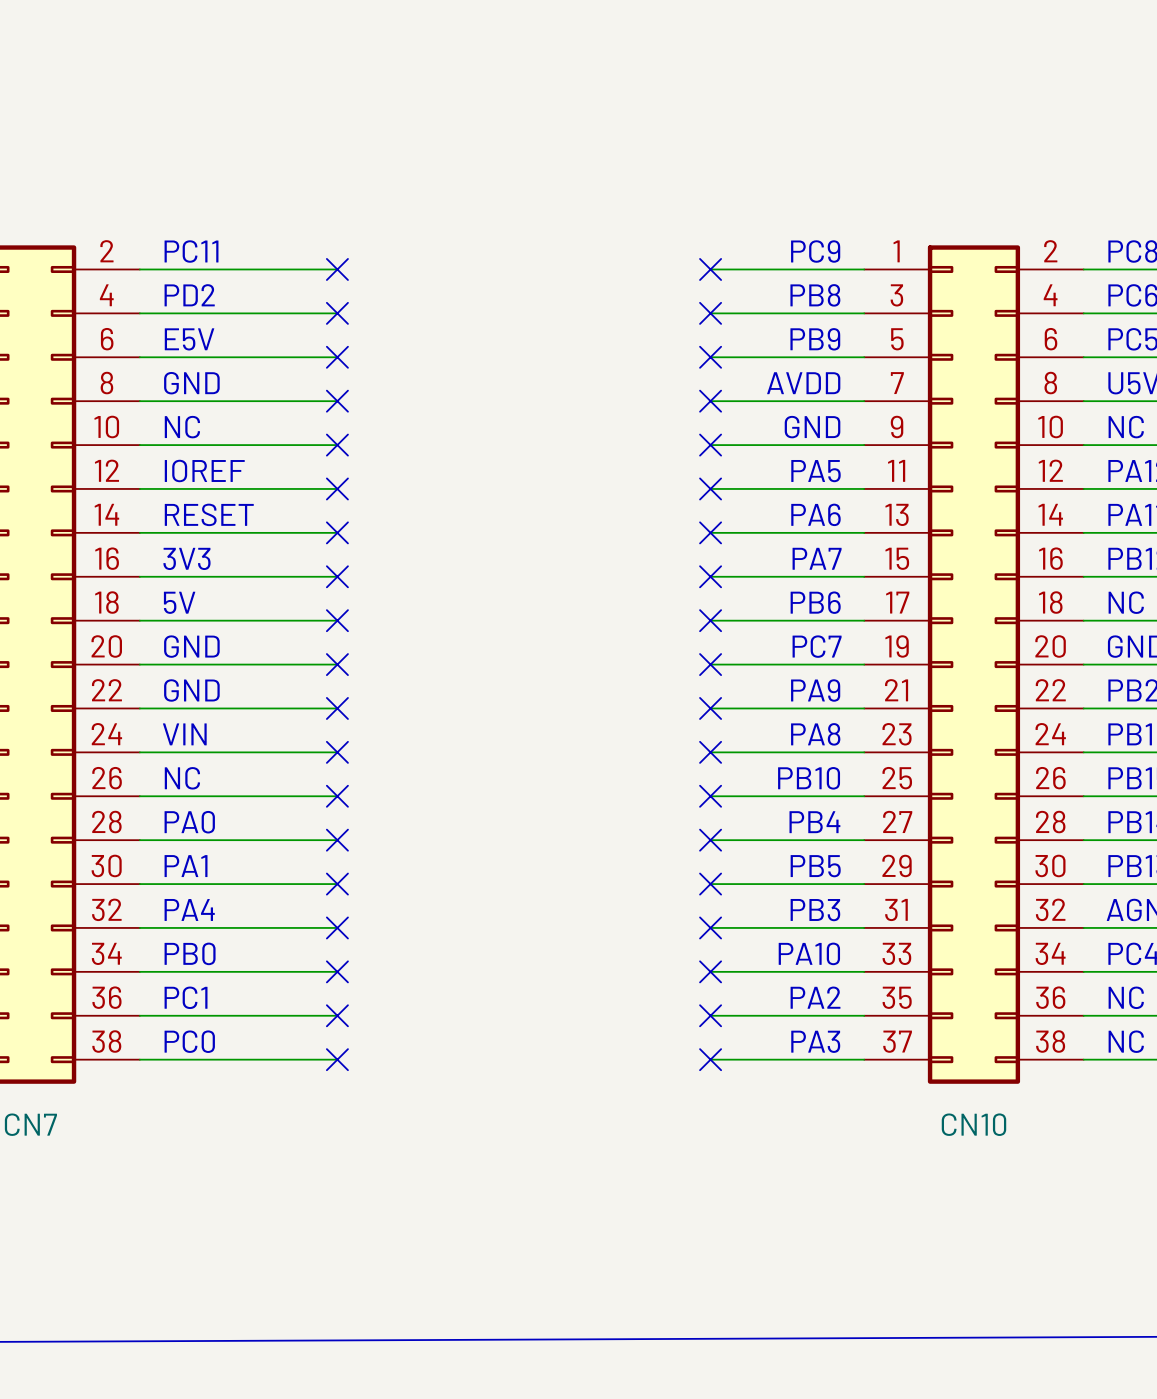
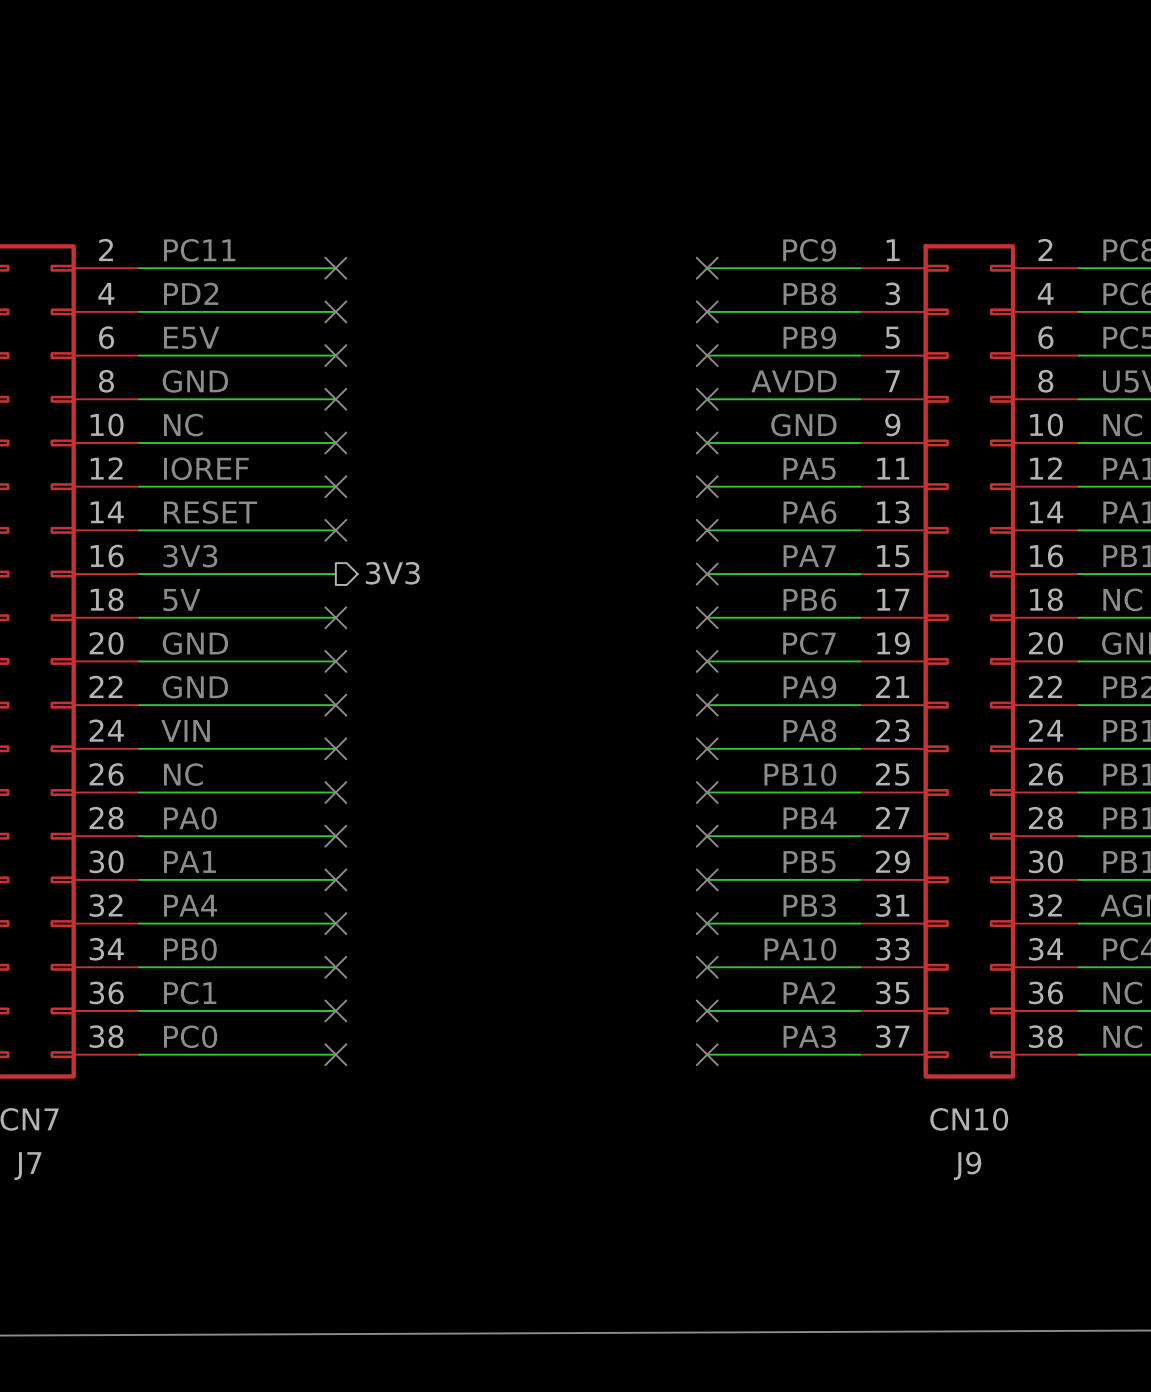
no-connect mark: (337, 576) -> none
hierarchical label: none -> 3V3 (392, 573)
J7 name: none -> J7 (27, 1166)
J9 name: none -> J9 (967, 1165)

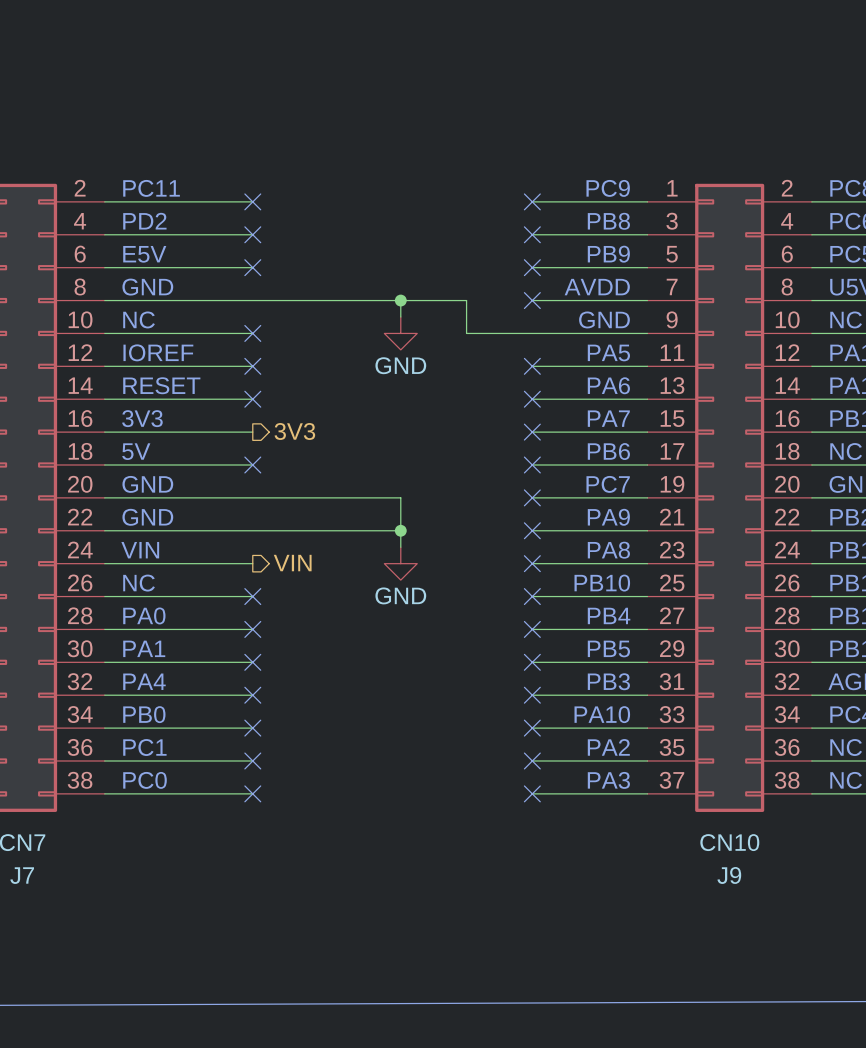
wire: none -> (252, 300) (466, 300) (466, 333) (532, 333)
no-connect mark: (335, 399) -> none
wire: none -> (400, 300) (400, 317)
junction: none -> (400, 300)
power symbol: none -> GND (400, 333)
no-connect mark: (707, 442) -> none
wire: none -> (252, 497) (400, 497) (400, 547)
no-connect mark: (335, 661) -> none
wire: none -> (252, 530) (400, 530)
no-connect mark: (335, 705) -> none
junction: none -> (400, 530)
no-connect mark: (335, 748) -> none
hierarchical label: none -> VIN (292, 563)
power symbol: none -> GND (400, 563)

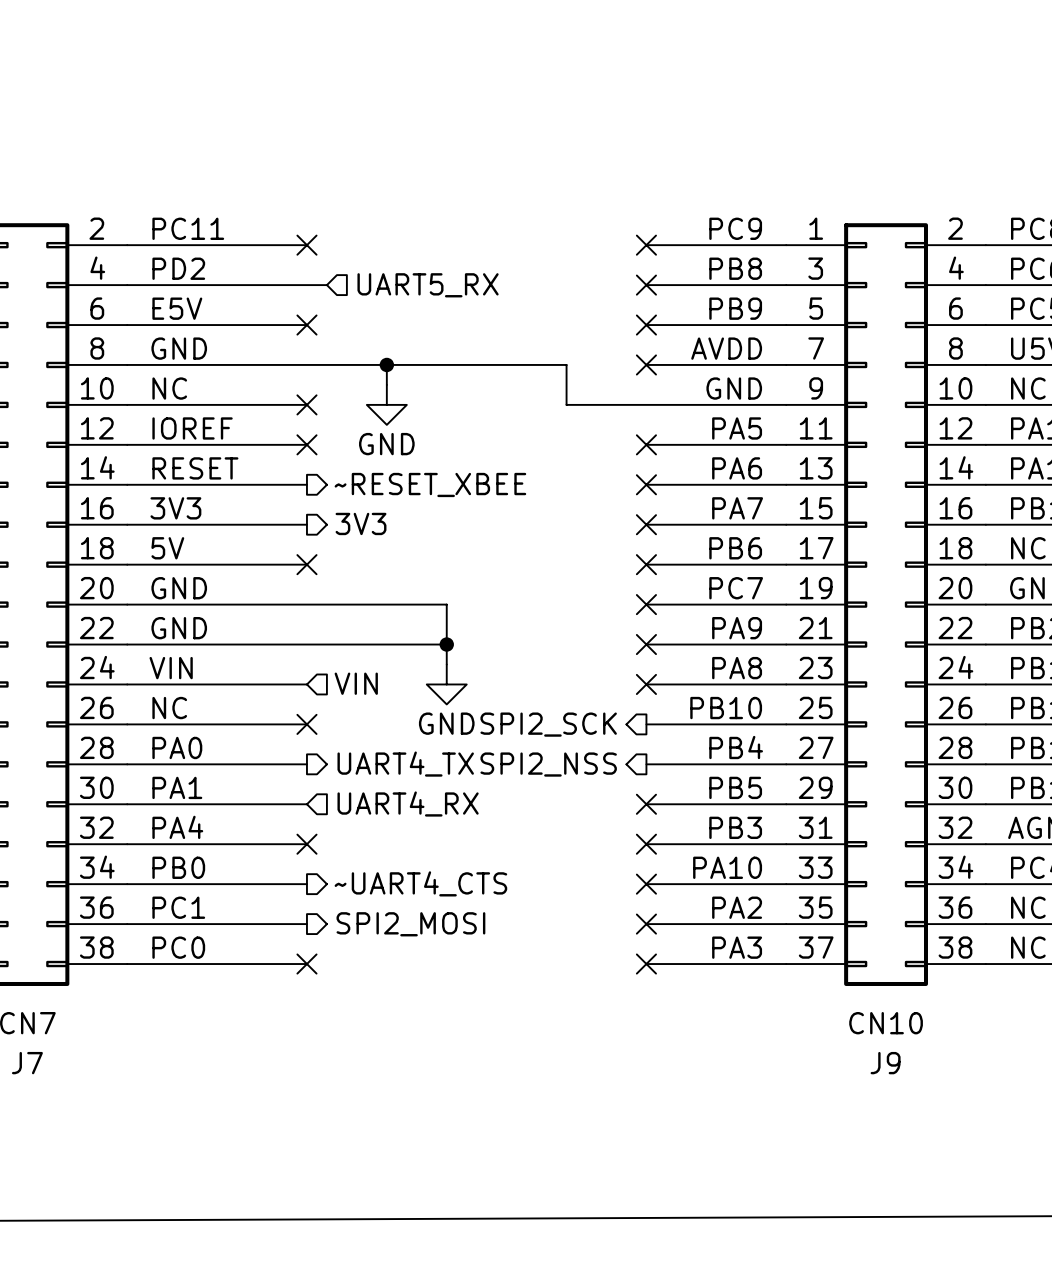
wire: none -> (306, 285) (326, 285)
no-connect mark: (252, 234) -> none
hierarchical label: none -> UART5_RX (428, 285)
junction: none -> (386, 364)
wire: (400, 300) (400, 317) -> (386, 364) (386, 384)
junction: (400, 300) -> none
power symbol position: GND (400, 333) -> GND (386, 404)
no-connect mark: (252, 399) -> none
hierarchical label: none -> ~RESET_XBEE (430, 484)
wire: (367, 497) (400, 497) (400, 547) -> (446, 604) (446, 664)
wire: (367, 530) (400, 530) -> none
junction position: (400, 530) -> (446, 644)
hierarchical label shape: output (292, 563) -> input (356, 683)
power symbol position: GND (400, 563) -> GND (446, 684)
no-connect mark: (532, 596) -> none
hierarchical label: none -> SPI2_SCK (548, 724)
no-connect mark: (252, 629) -> none
no-connect mark: (532, 629) -> none
hierarchical label: none -> UART4_TX (405, 764)
hierarchical label: none -> SPI2_NSS (548, 764)
no-connect mark: (252, 662) -> none
hierarchical label: none -> UART4_RX (408, 804)
no-connect mark: (252, 728) -> none
hierarchical label: none -> ~UART4_CTS (420, 883)
no-connect mark: (252, 760) -> none
hierarchical label: none -> SPI2_MOSI (410, 924)

